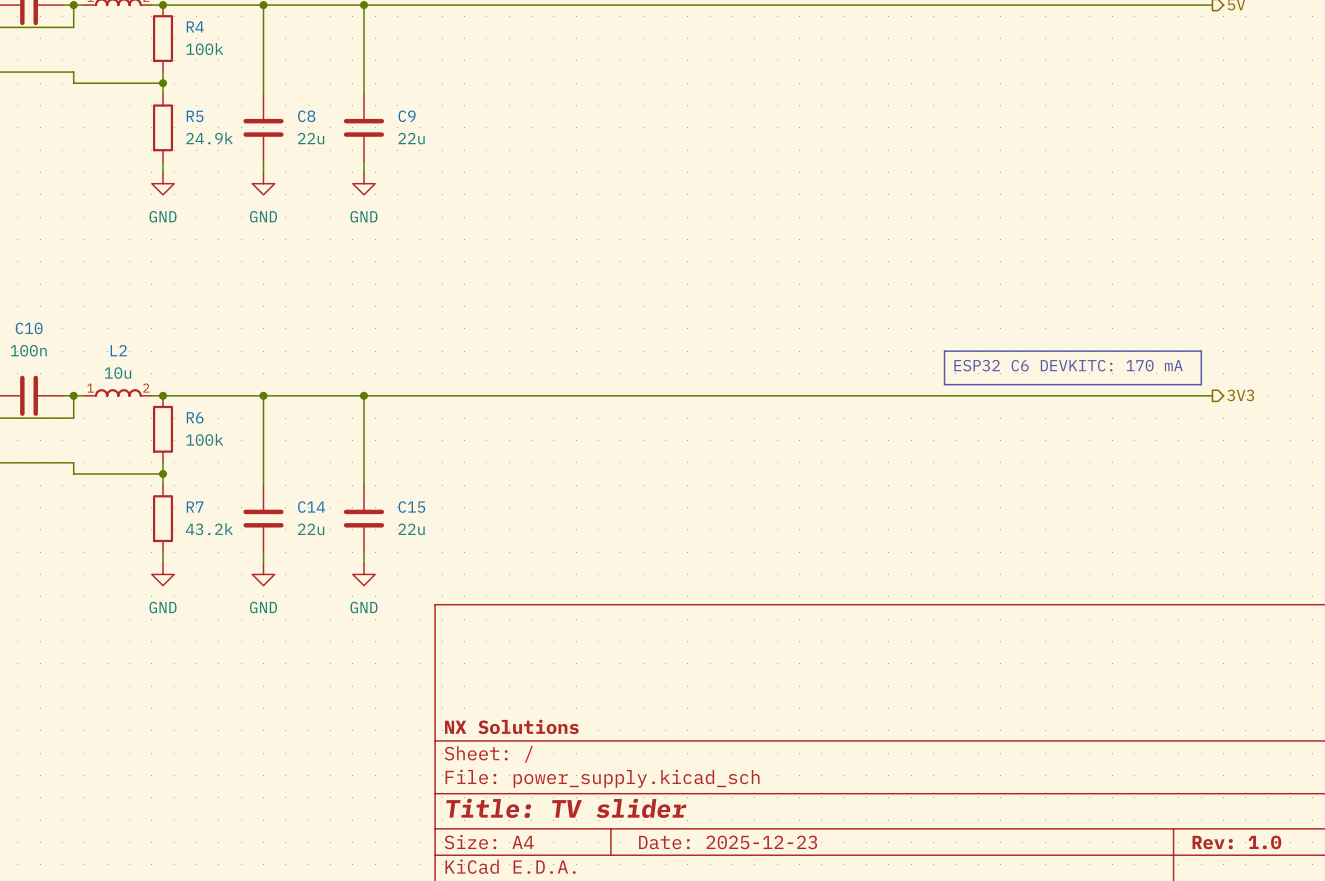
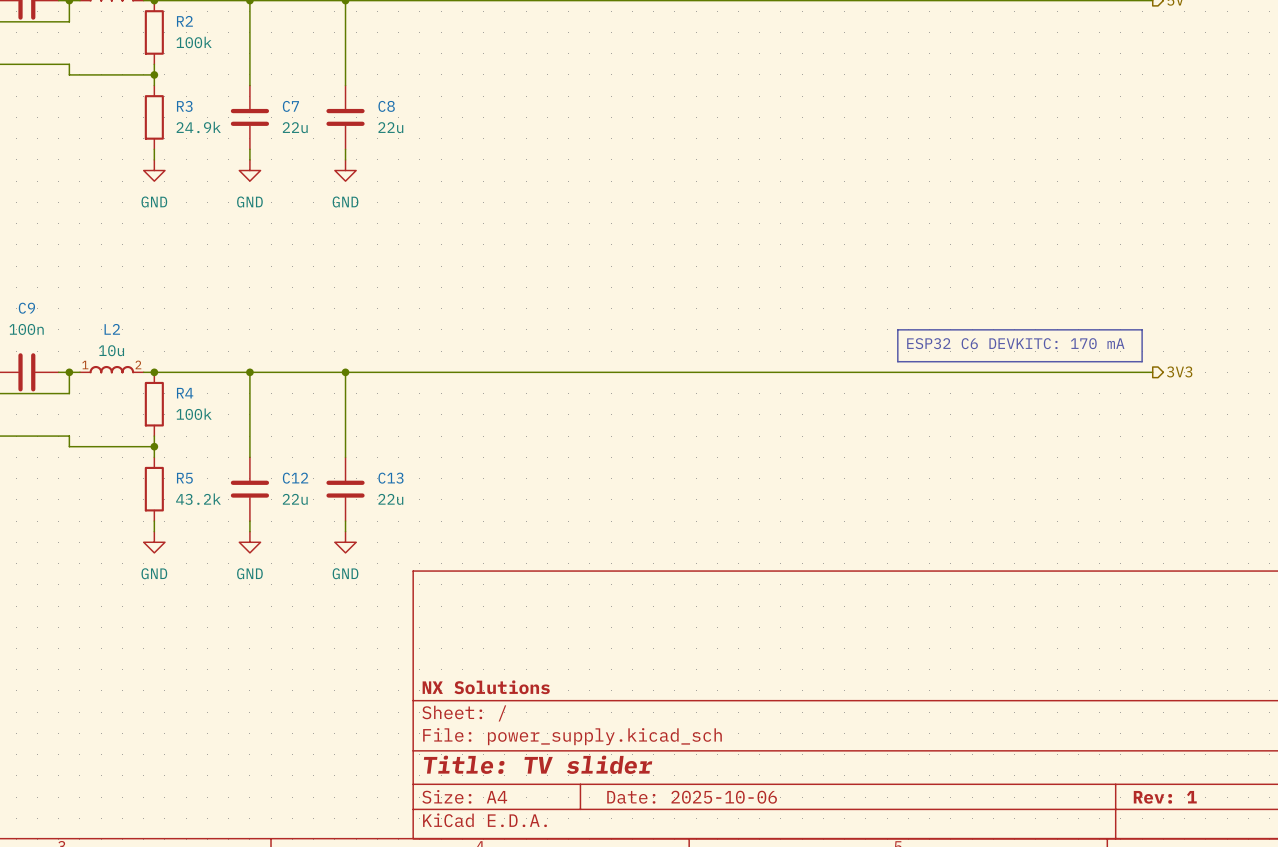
R4 name: R4 (195, 26) -> R2 (184, 21)
R5 name: R5 (195, 116) -> R3 (184, 106)
C8 name: C8 (306, 116) -> C7 (290, 106)
C9 name: C9 (407, 116) -> C8 (386, 106)
C10 name: C10 (29, 328) -> C9 (26, 308)
R6 name: R6 (195, 417) -> R4 (185, 393)
R7 name: R7 (195, 507) -> R5 (184, 478)
C14 name: C14 (311, 507) -> C12 (295, 478)
C15 name: C15 (411, 507) -> C13 (390, 478)
title block: Date: 2025-12-23 (728, 842) -> Date: 2025-10-06 (692, 797)
title block: Rev: 1.0 (1236, 842) -> Rev: 1 (1165, 797)

